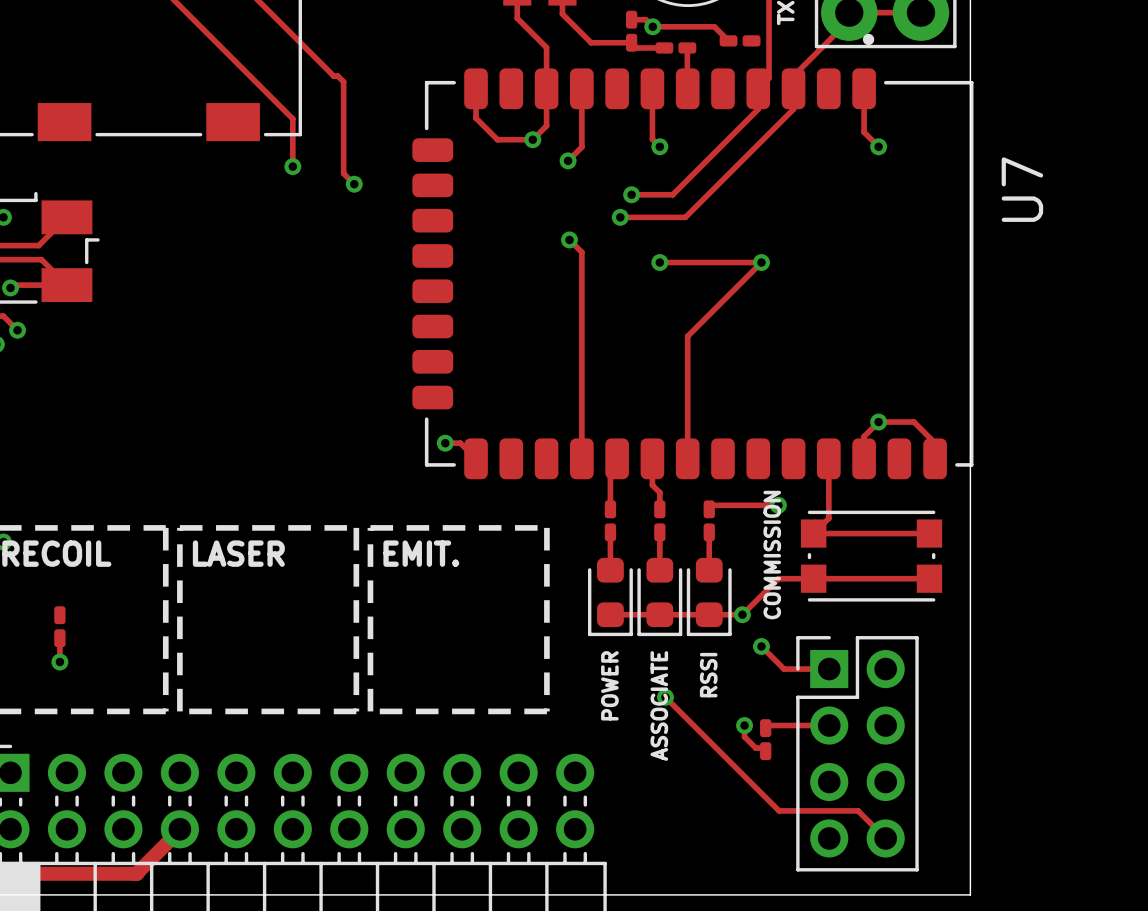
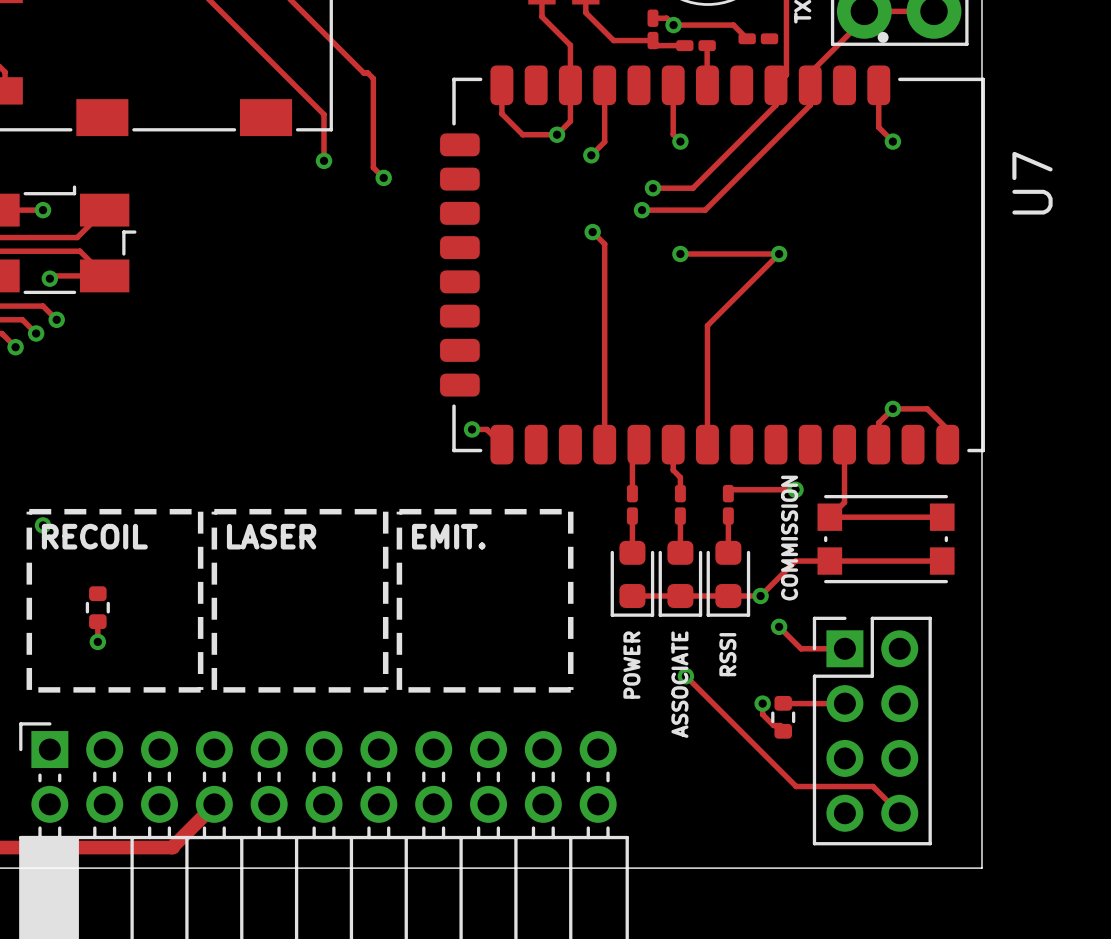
part footprint: [54, 606, 66, 648] -> [85, 586, 110, 630]
part footprint: [760, 719, 772, 761] -> [771, 695, 796, 739]

